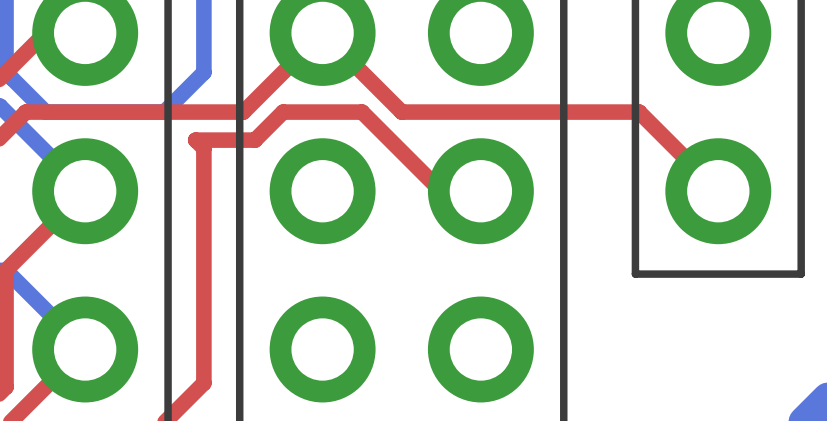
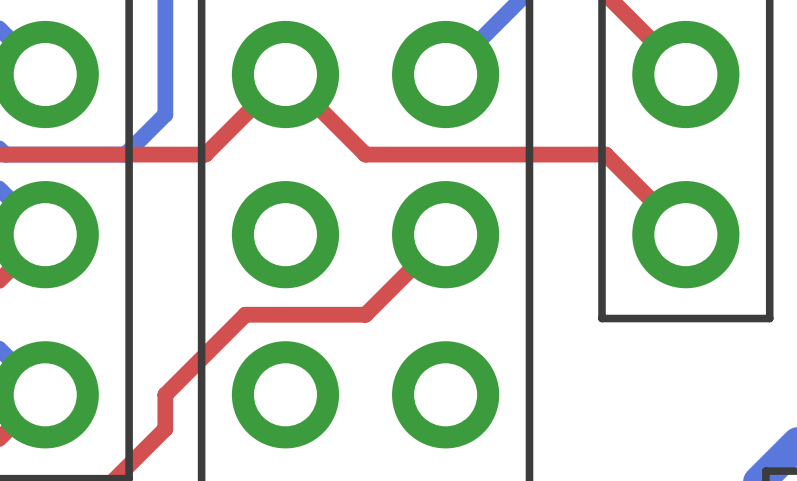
top track: (480, 191) (441, 191) (362, 112) (283, 112) (255, 140) (195, 140) (203, 148) (203, 349) -> (445, 234) (365, 314) (245, 314) (165, 394)

